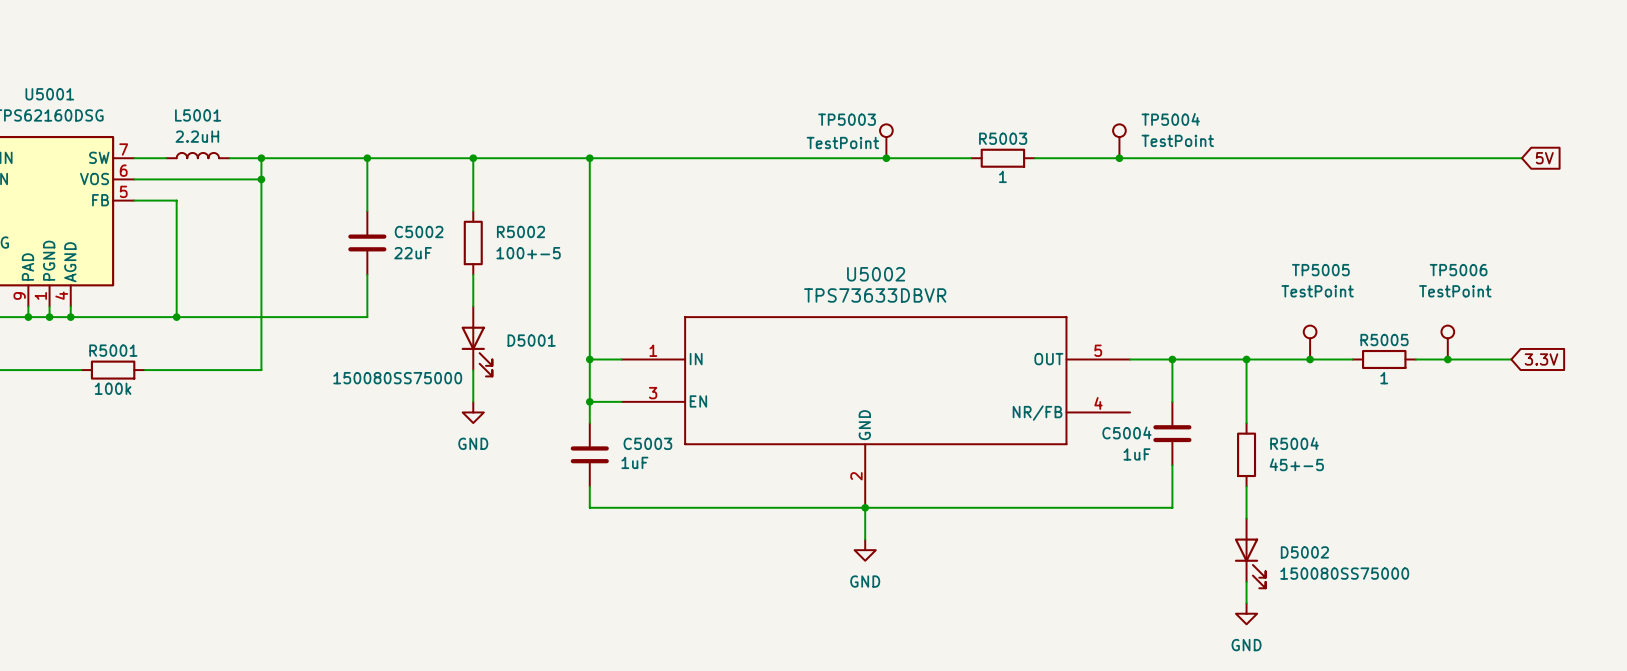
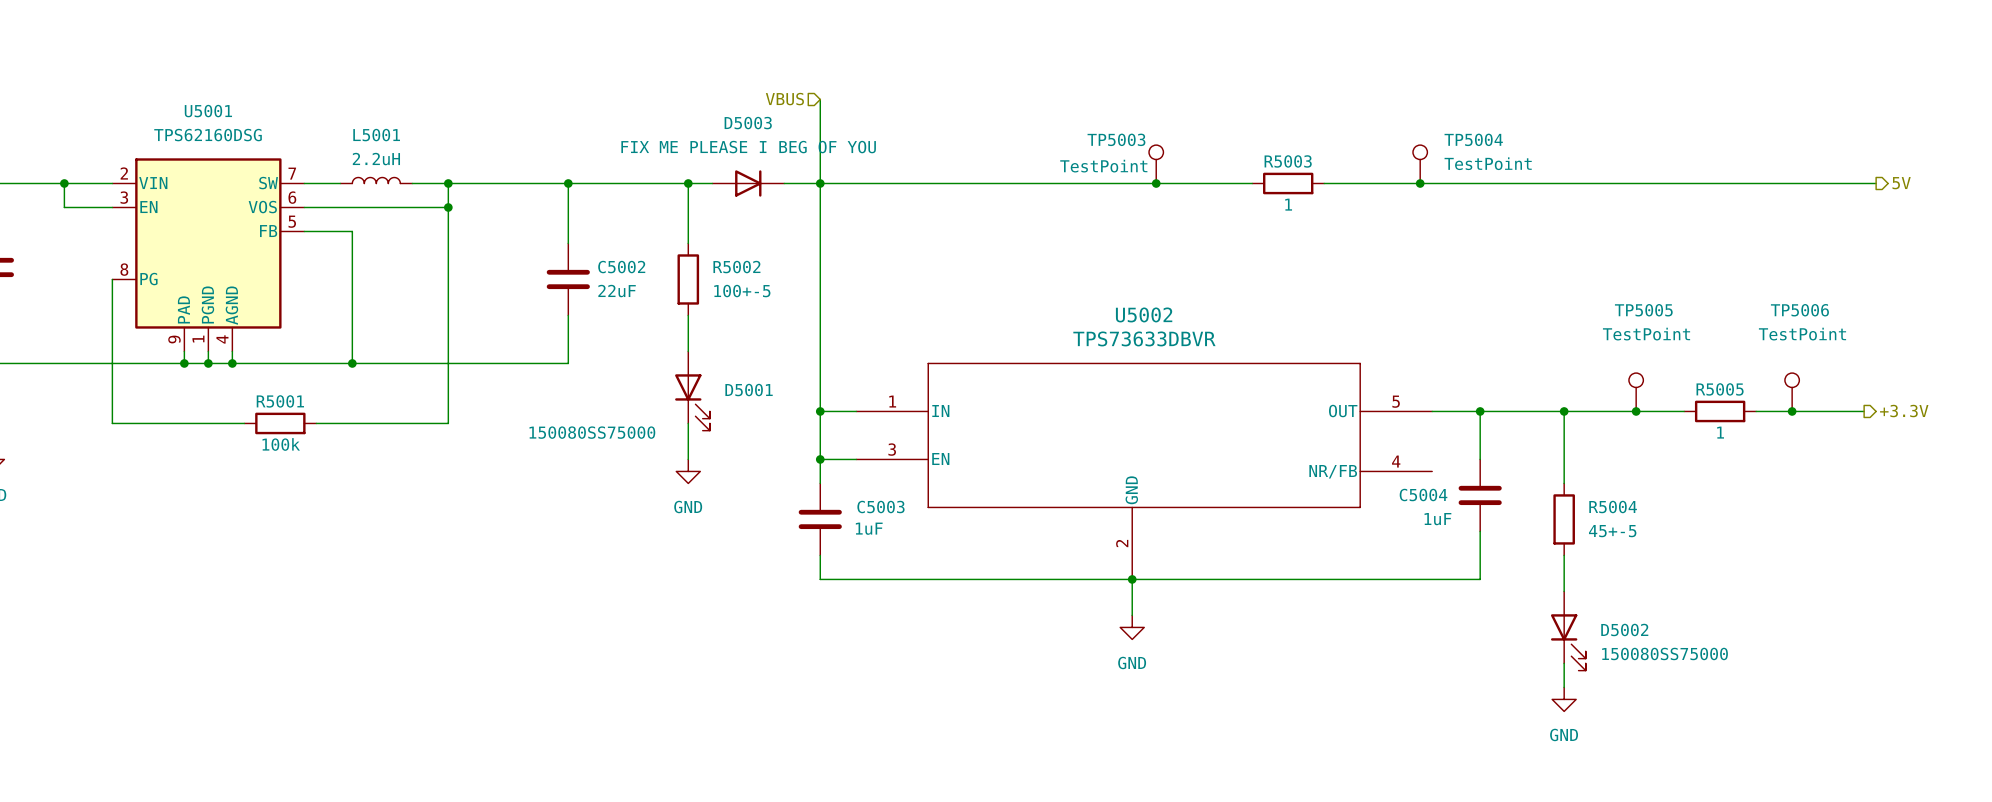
hierarchical label: none -> VBUS (784, 99)
wire: none -> (820, 99) (820, 183)
hierarchical label: none -> 5V (1901, 183)
D5003: none -> FIX ME PLEASE I BEG OF YOU (748, 183)
global label: 5V (1544, 158) -> none
global label: 3.3V (1541, 359) -> none
hierarchical label: none -> +3.3V (1904, 411)

